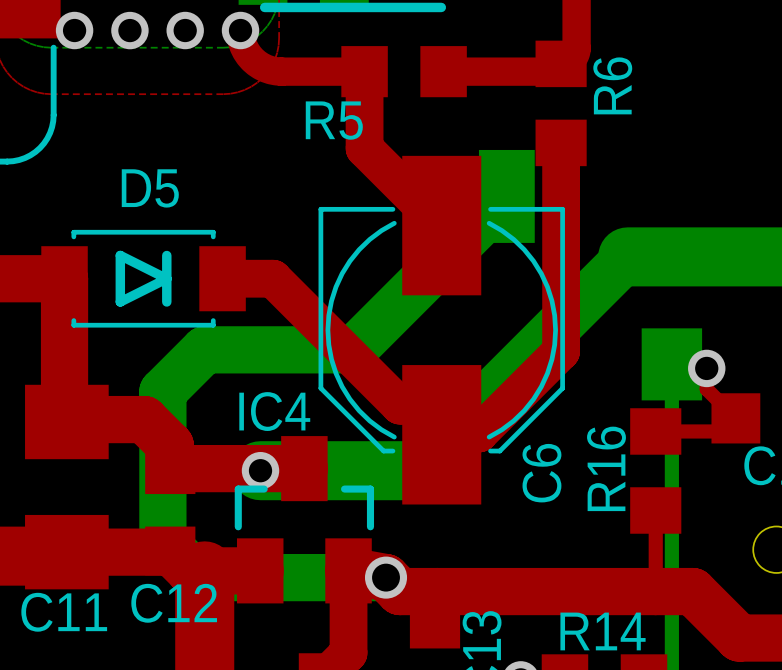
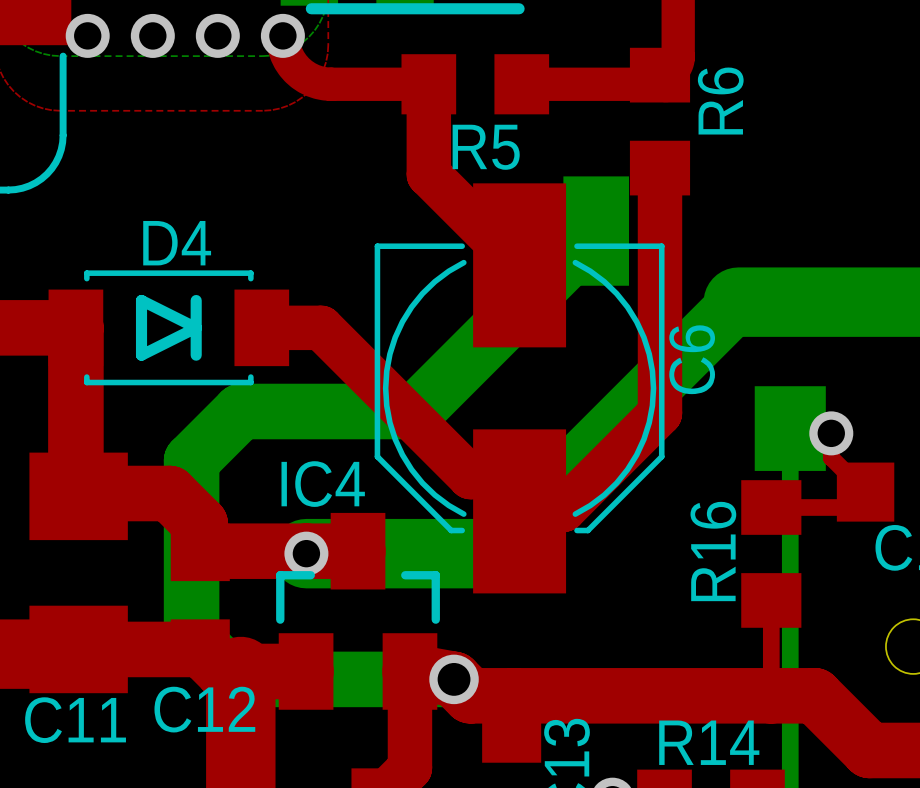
R5 name position: R5 (334, 120) -> R5 (486, 147)
D5 name: D5 (150, 188) -> D4 (177, 243)
C6 name position: C6 (541, 473) -> C6 (692, 359)

